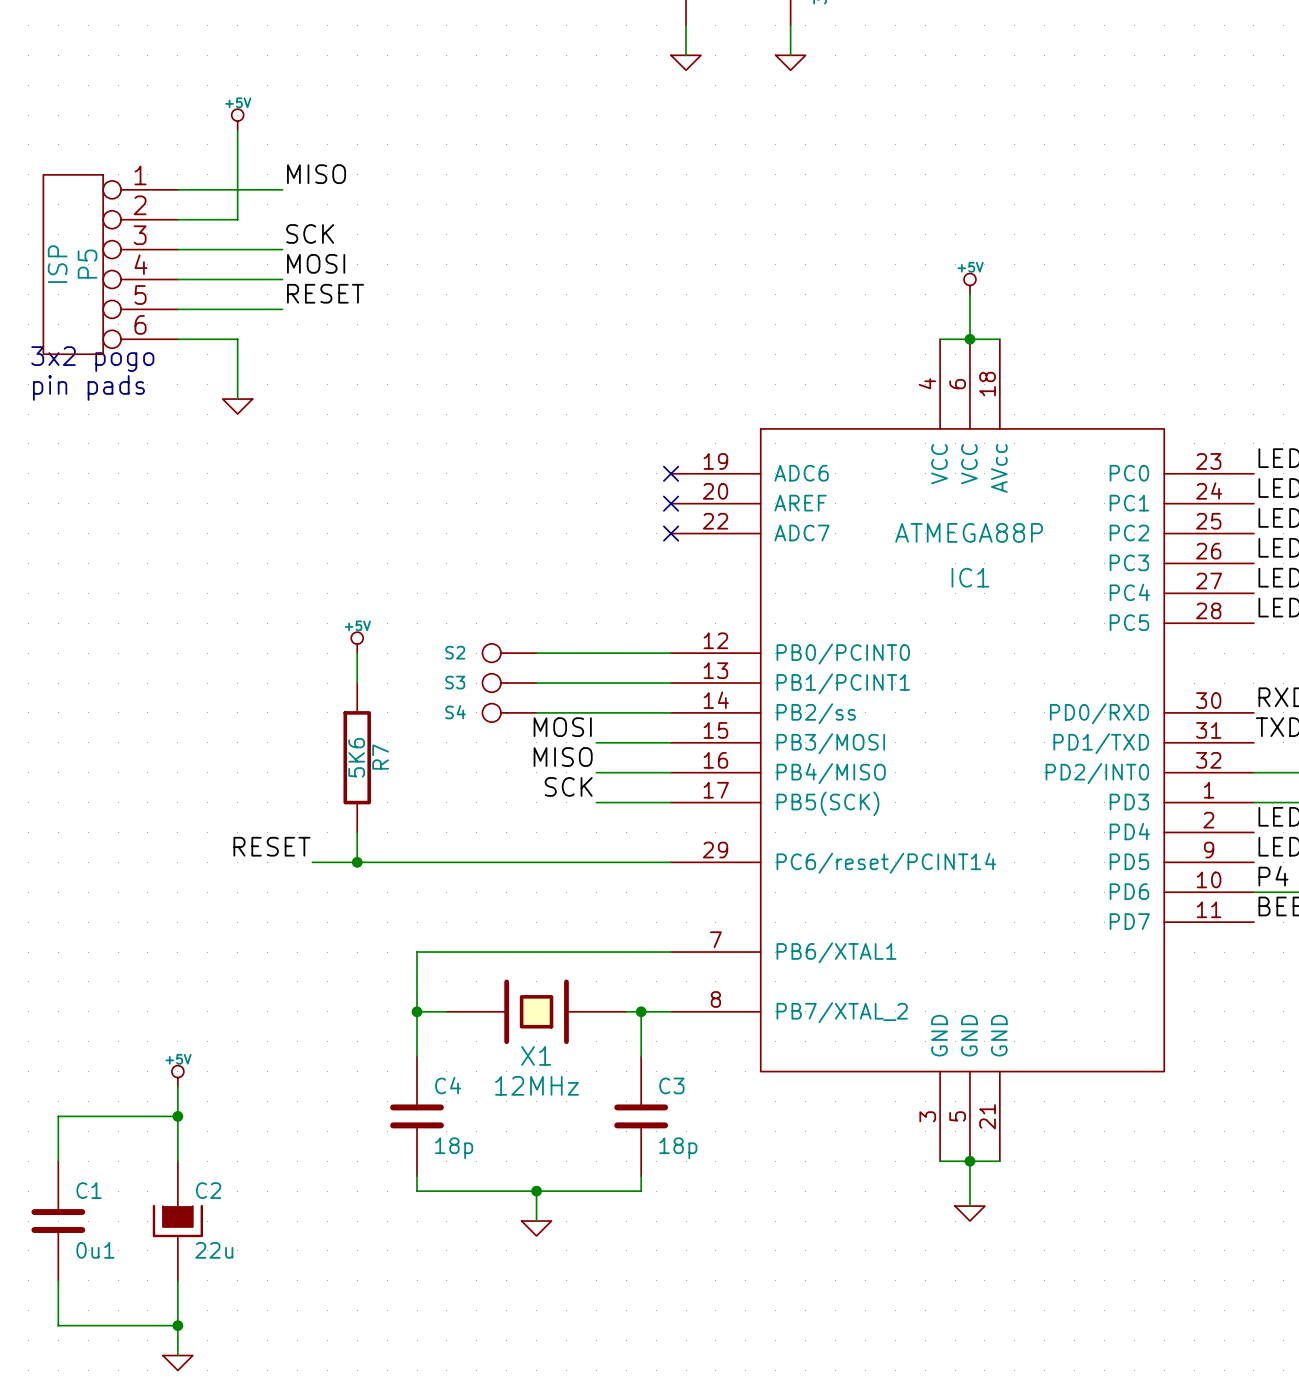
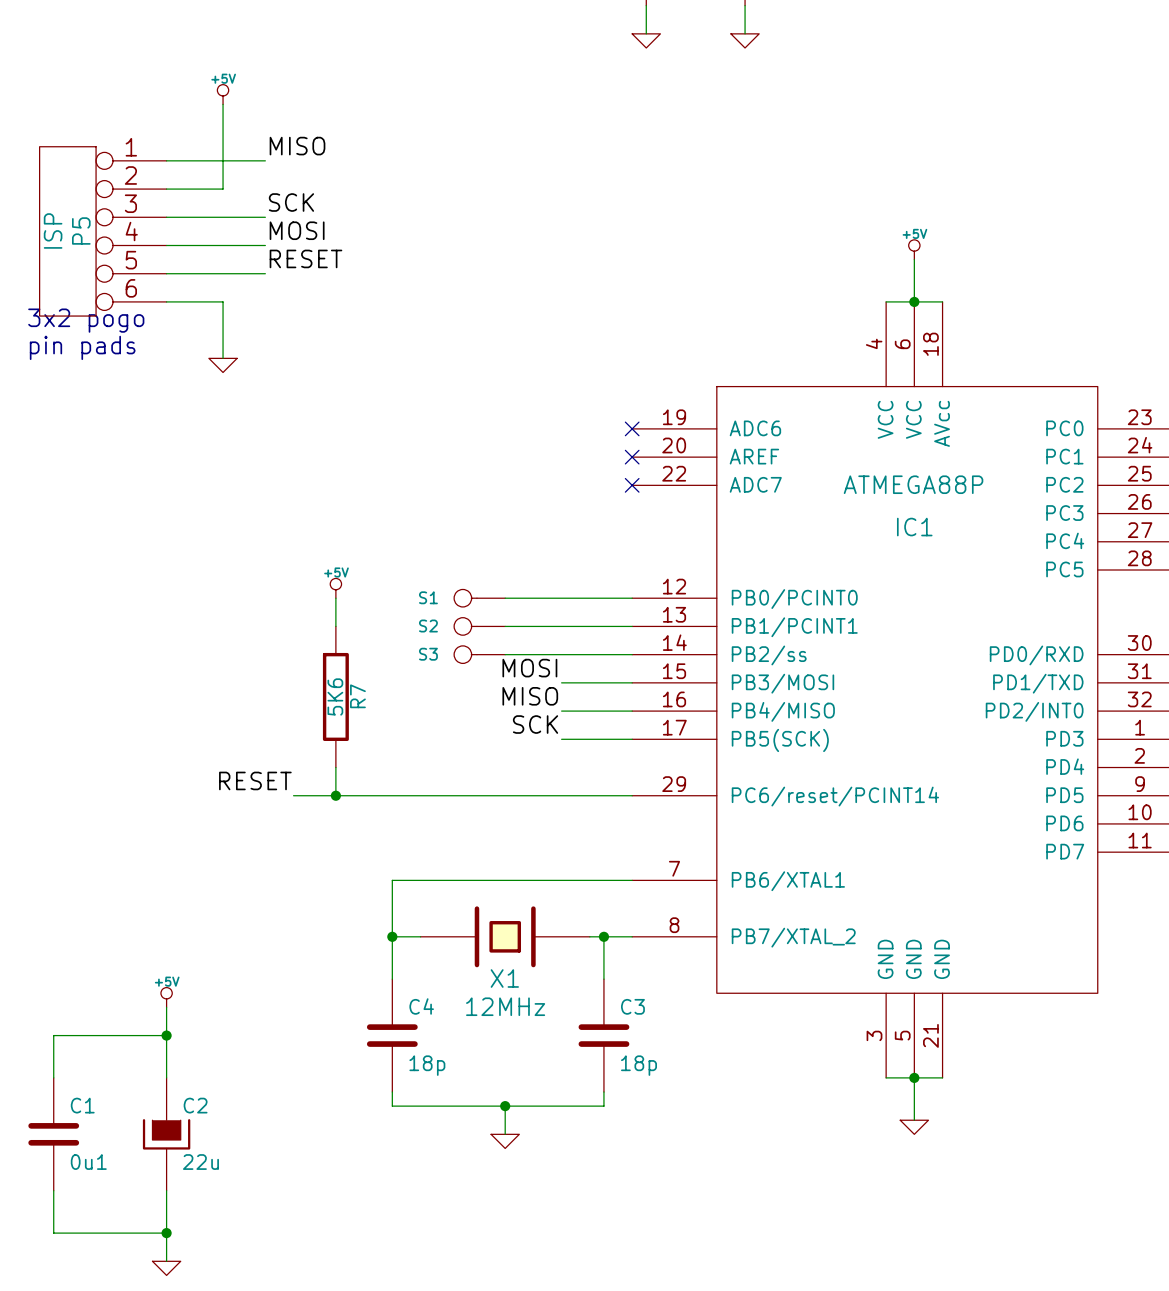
S2 name: S2 (455, 652) -> S1 (428, 597)
S3 name: S3 (455, 682) -> S2 (428, 626)
S4 name: S4 (455, 712) -> S3 (428, 654)

